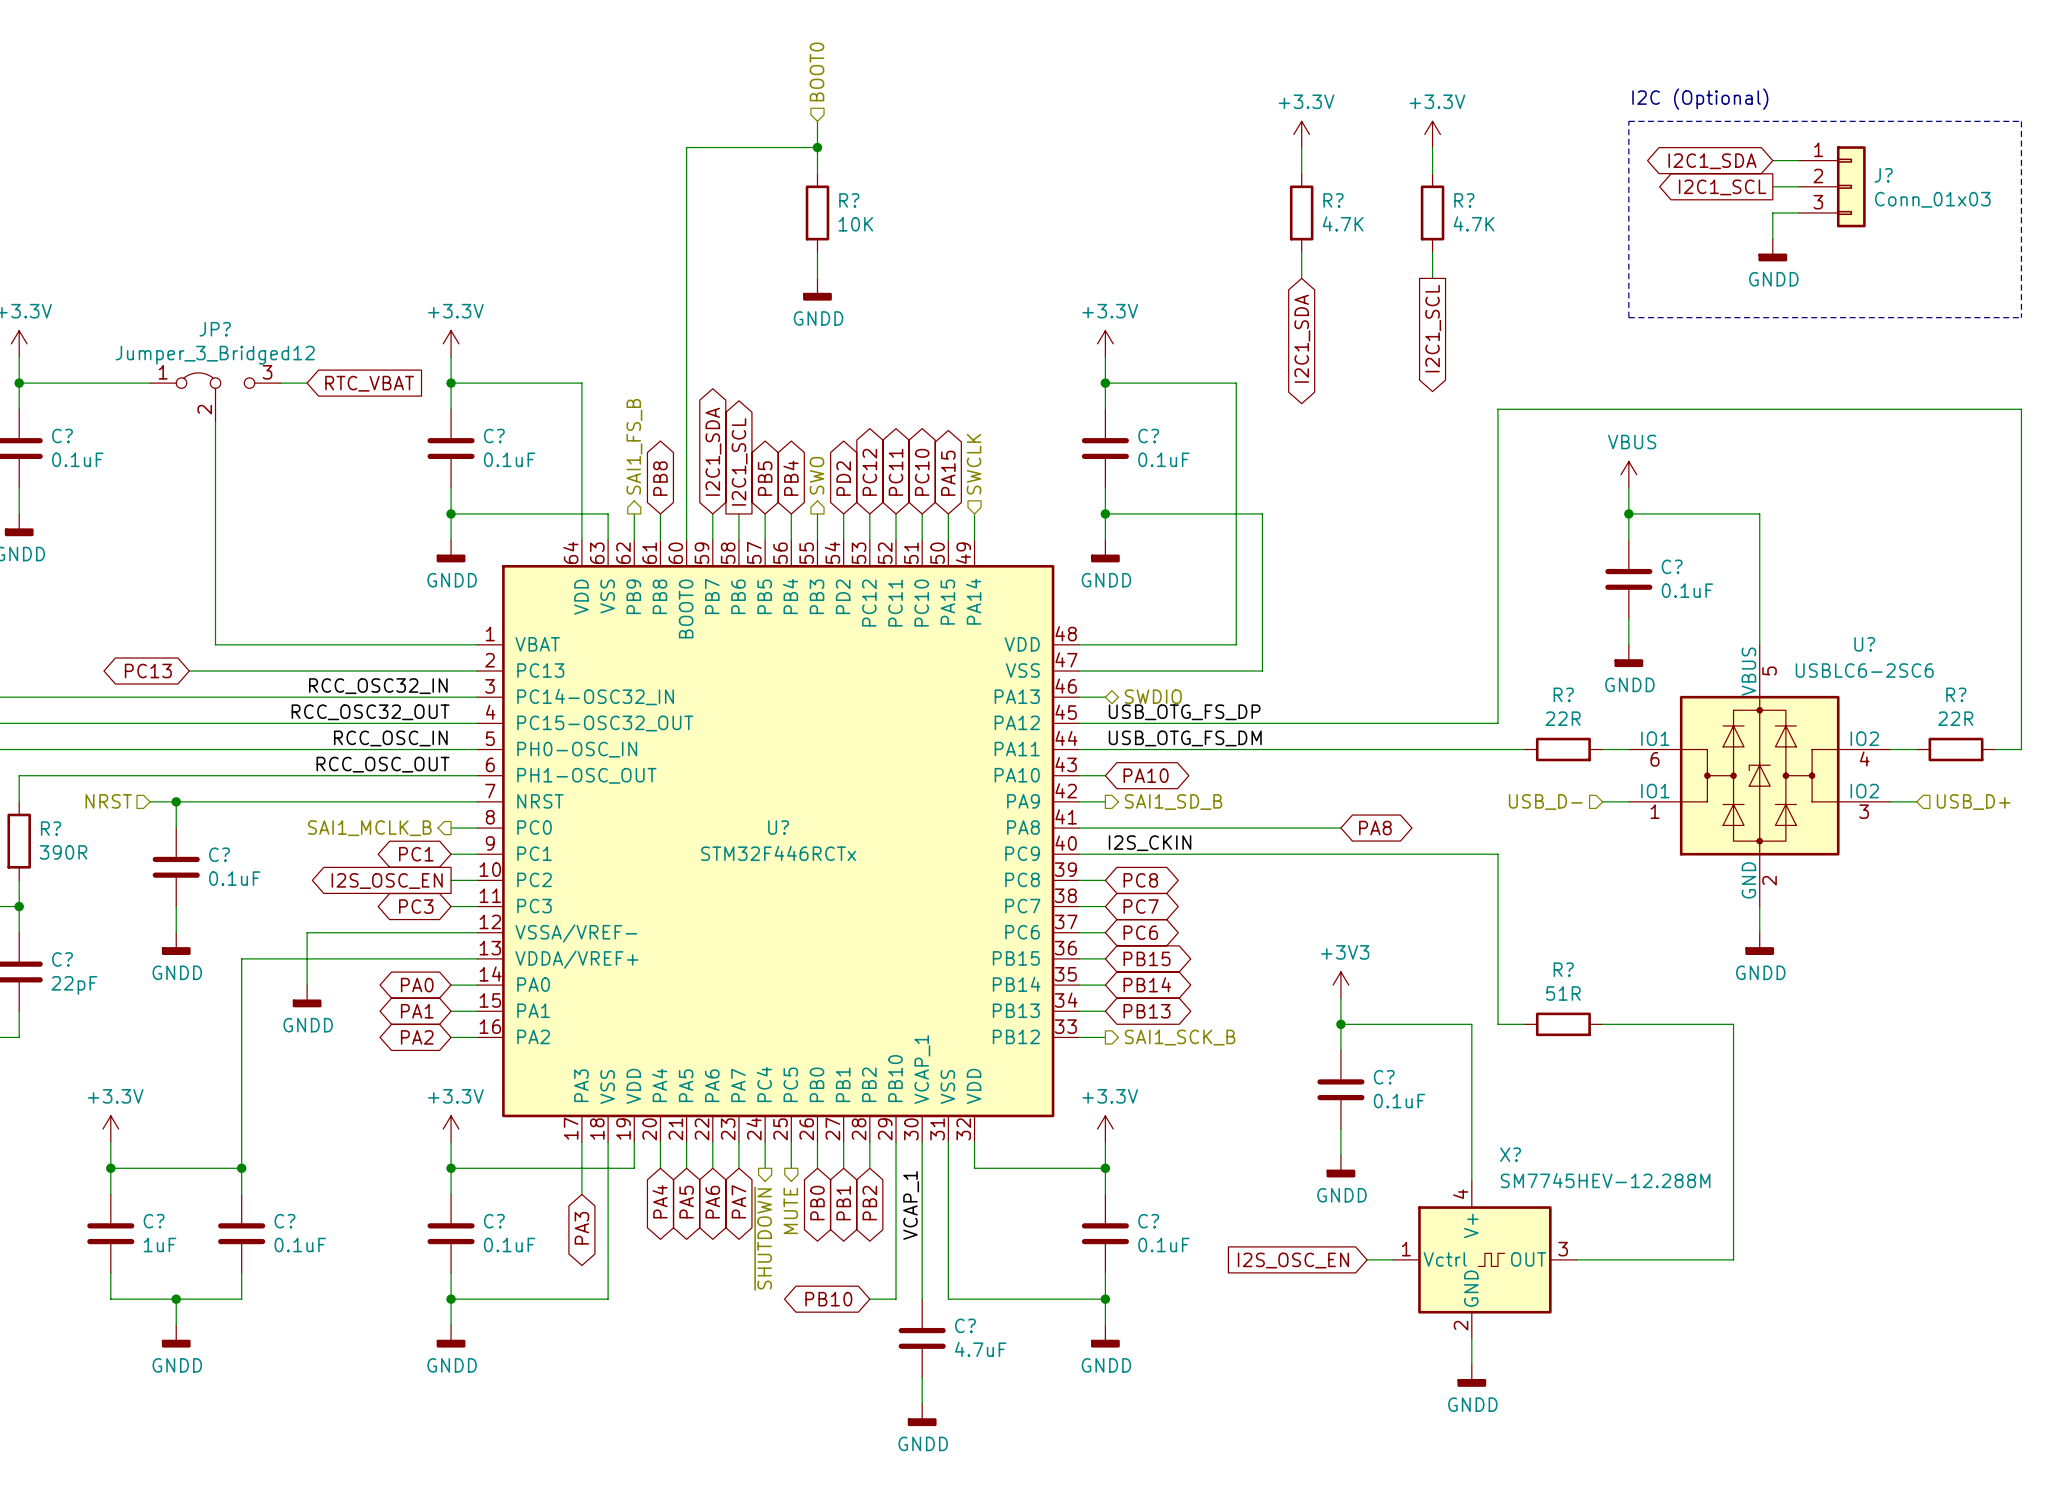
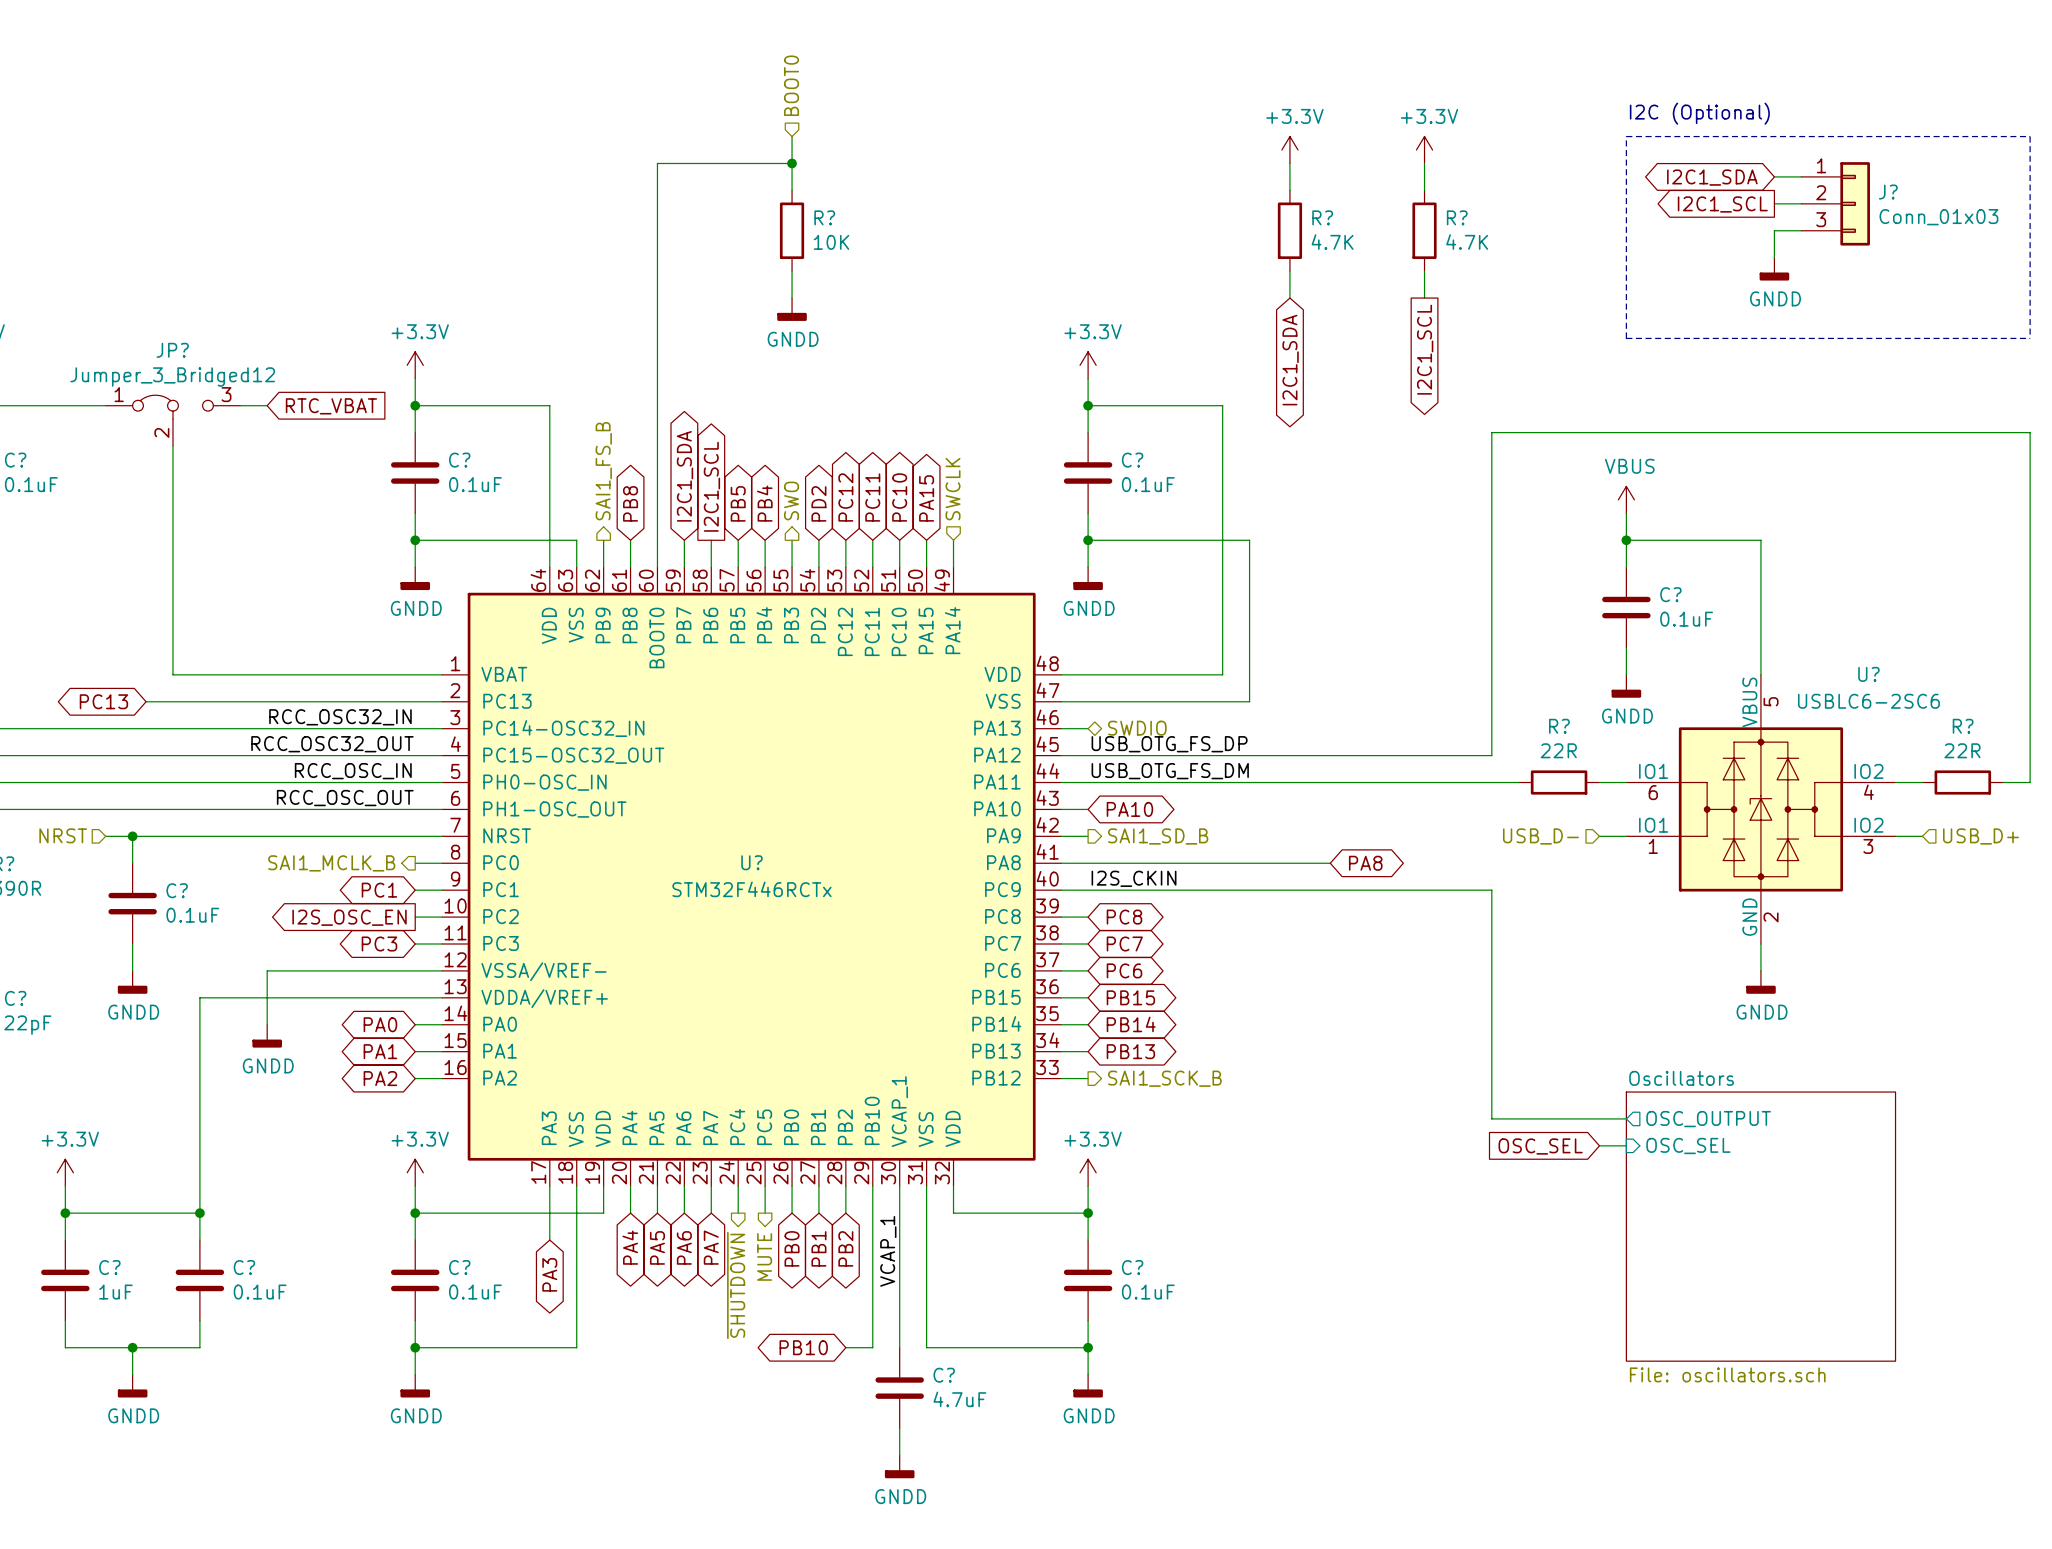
power symbol: +3V3 (1340, 985) -> none
wire: (1340, 998) (1340, 1050) -> none
wire: (1340, 1024) (1471, 1024) (1471, 1181) -> none
junction: (1340, 1024) -> none
wire: (1497, 1024) (1524, 1024) -> (1491, 1065) (1491, 1118) (1626, 1118)
R?: 51R (1563, 1024) -> none
wire: (1602, 1024) (1733, 1024) (1733, 1259) (1576, 1259) -> none
sheet pin: none -> OSC_OUTPUT (1708, 1119)
C?: 0.1uF (1340, 1089) -> none
wire: none -> (1599, 1145) (1626, 1145)
sheet pin: none -> OSC_SEL (1688, 1145)
global label: none -> OSC_SEL (1540, 1146)
wire: (1340, 1129) (1340, 1155) -> none
power symbol: GNDD (1340, 1166) -> none
sheet Oscillators: none -> File: oscillators.sch (1760, 1226)
wire: (1367, 1259) (1393, 1259) -> none
X?: SM7745HEV-12.288M (1484, 1259) -> none
global label: I2S_OSC_EN (1293, 1260) -> none
wire: (1471, 1338) (1471, 1364) -> none
power symbol: GNDD (1471, 1375) -> none

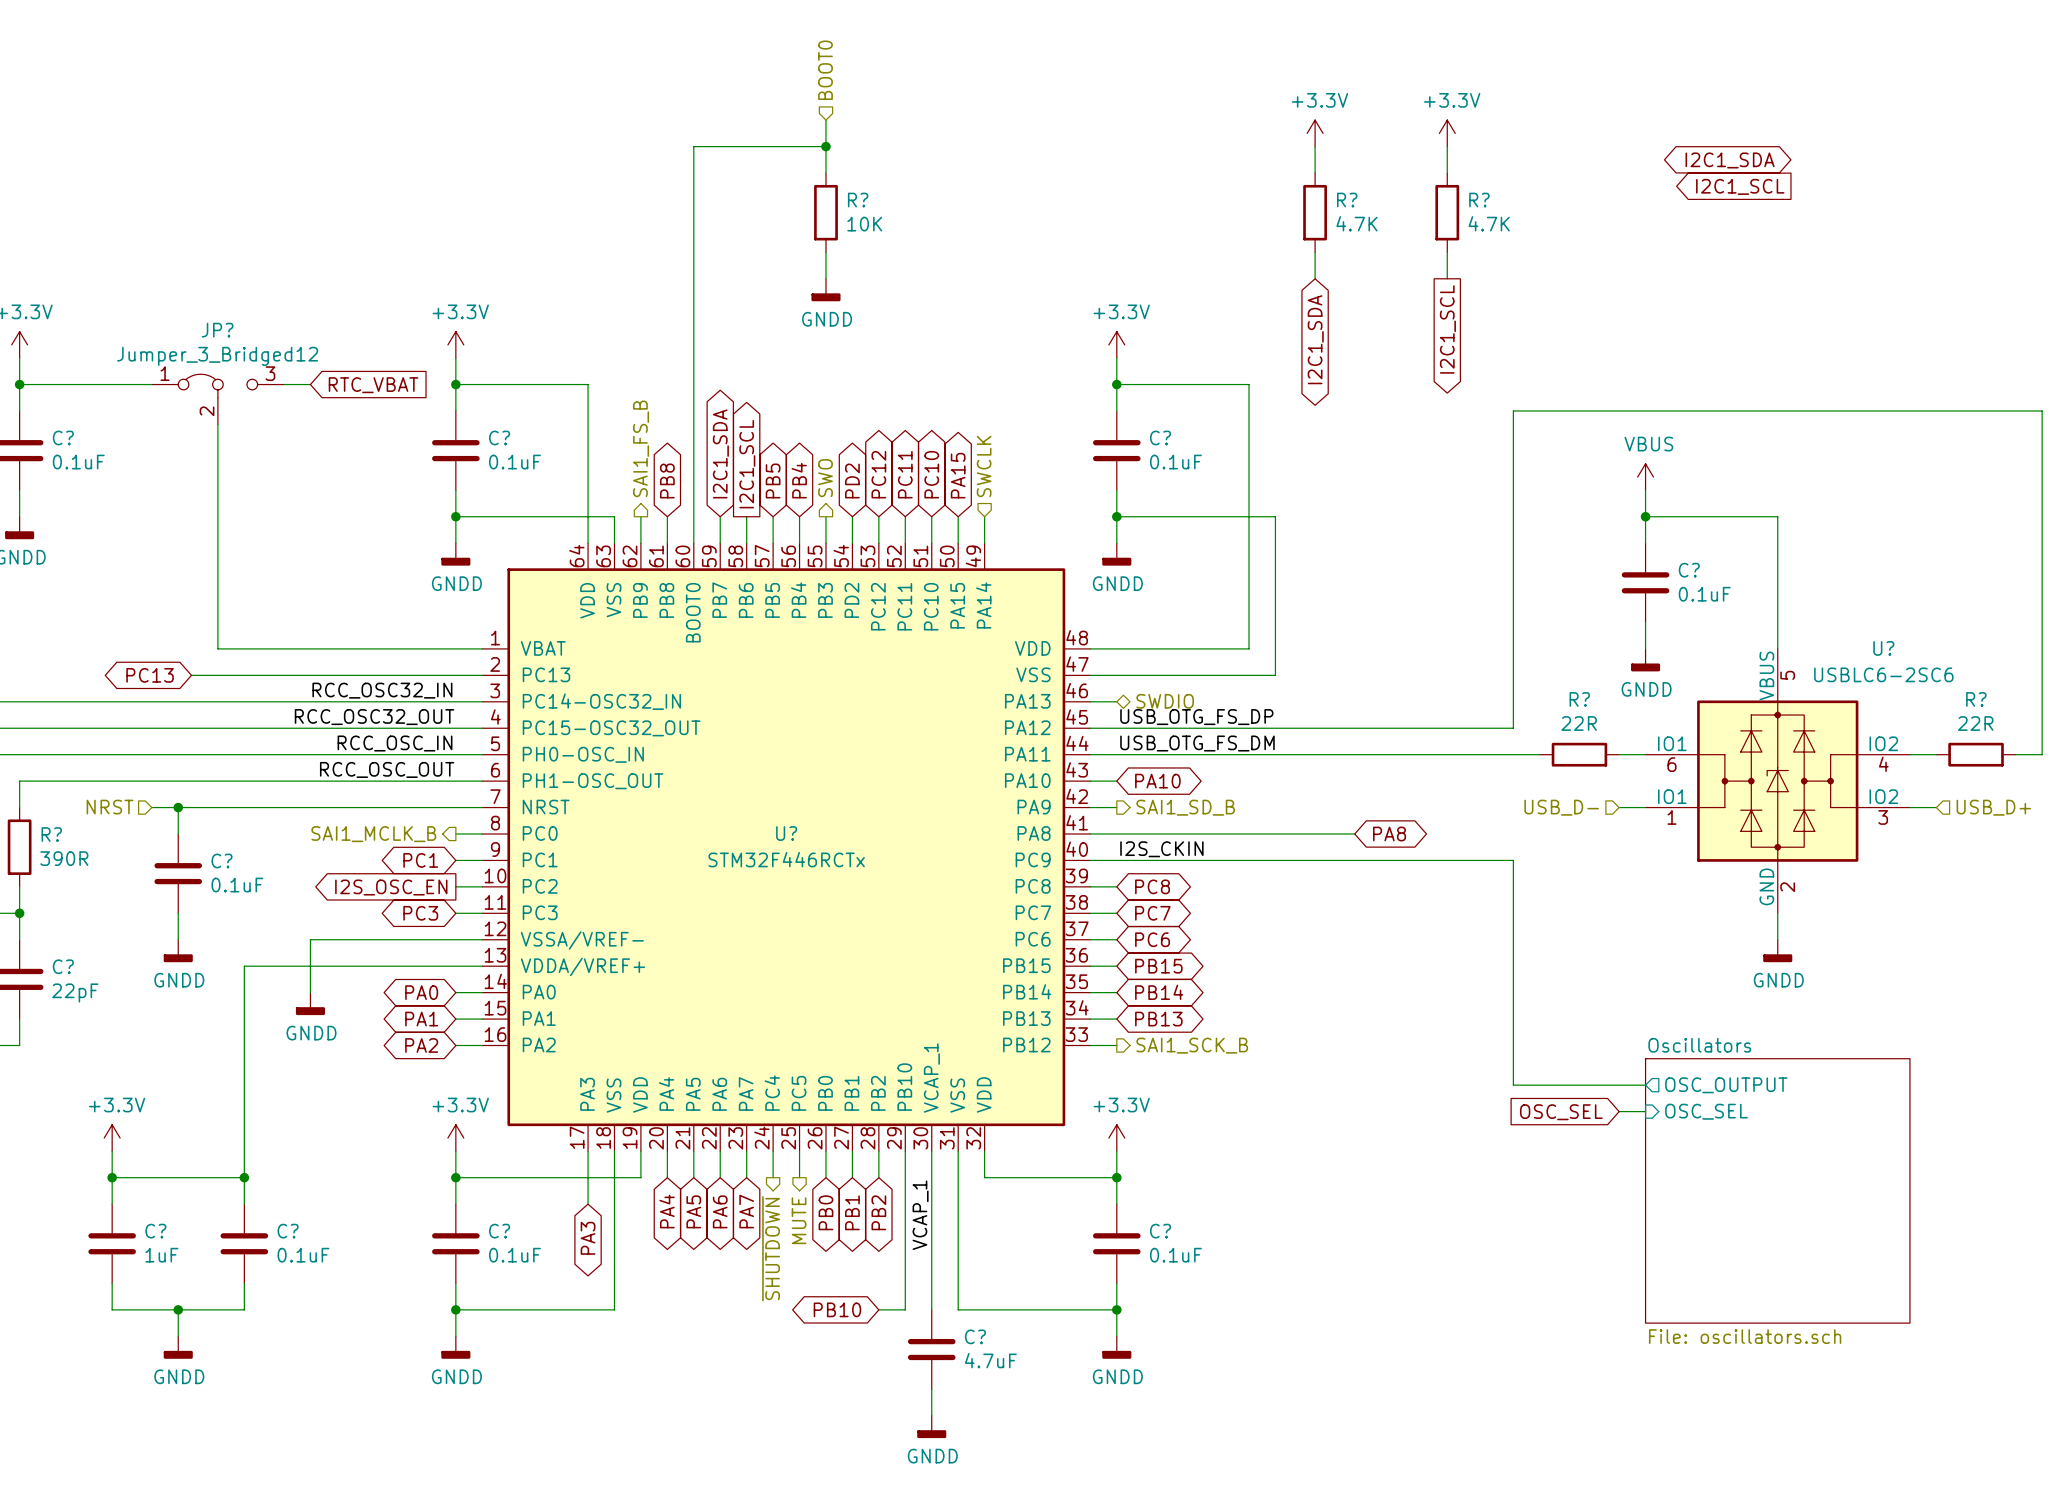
text: I2C (Optional) (1699, 113) -> none
line: (1626, 136) (2030, 136) (2030, 338) (1626, 338) (1626, 136) -> none
wire: (1774, 176) (1801, 176) -> none
wire: (1774, 203) (1801, 203) -> none
J?: Conn_01x03 (1835, 203) -> none
wire: (1801, 230) (1774, 230) (1774, 257) -> none
power symbol: GNDD (1774, 269) -> none

